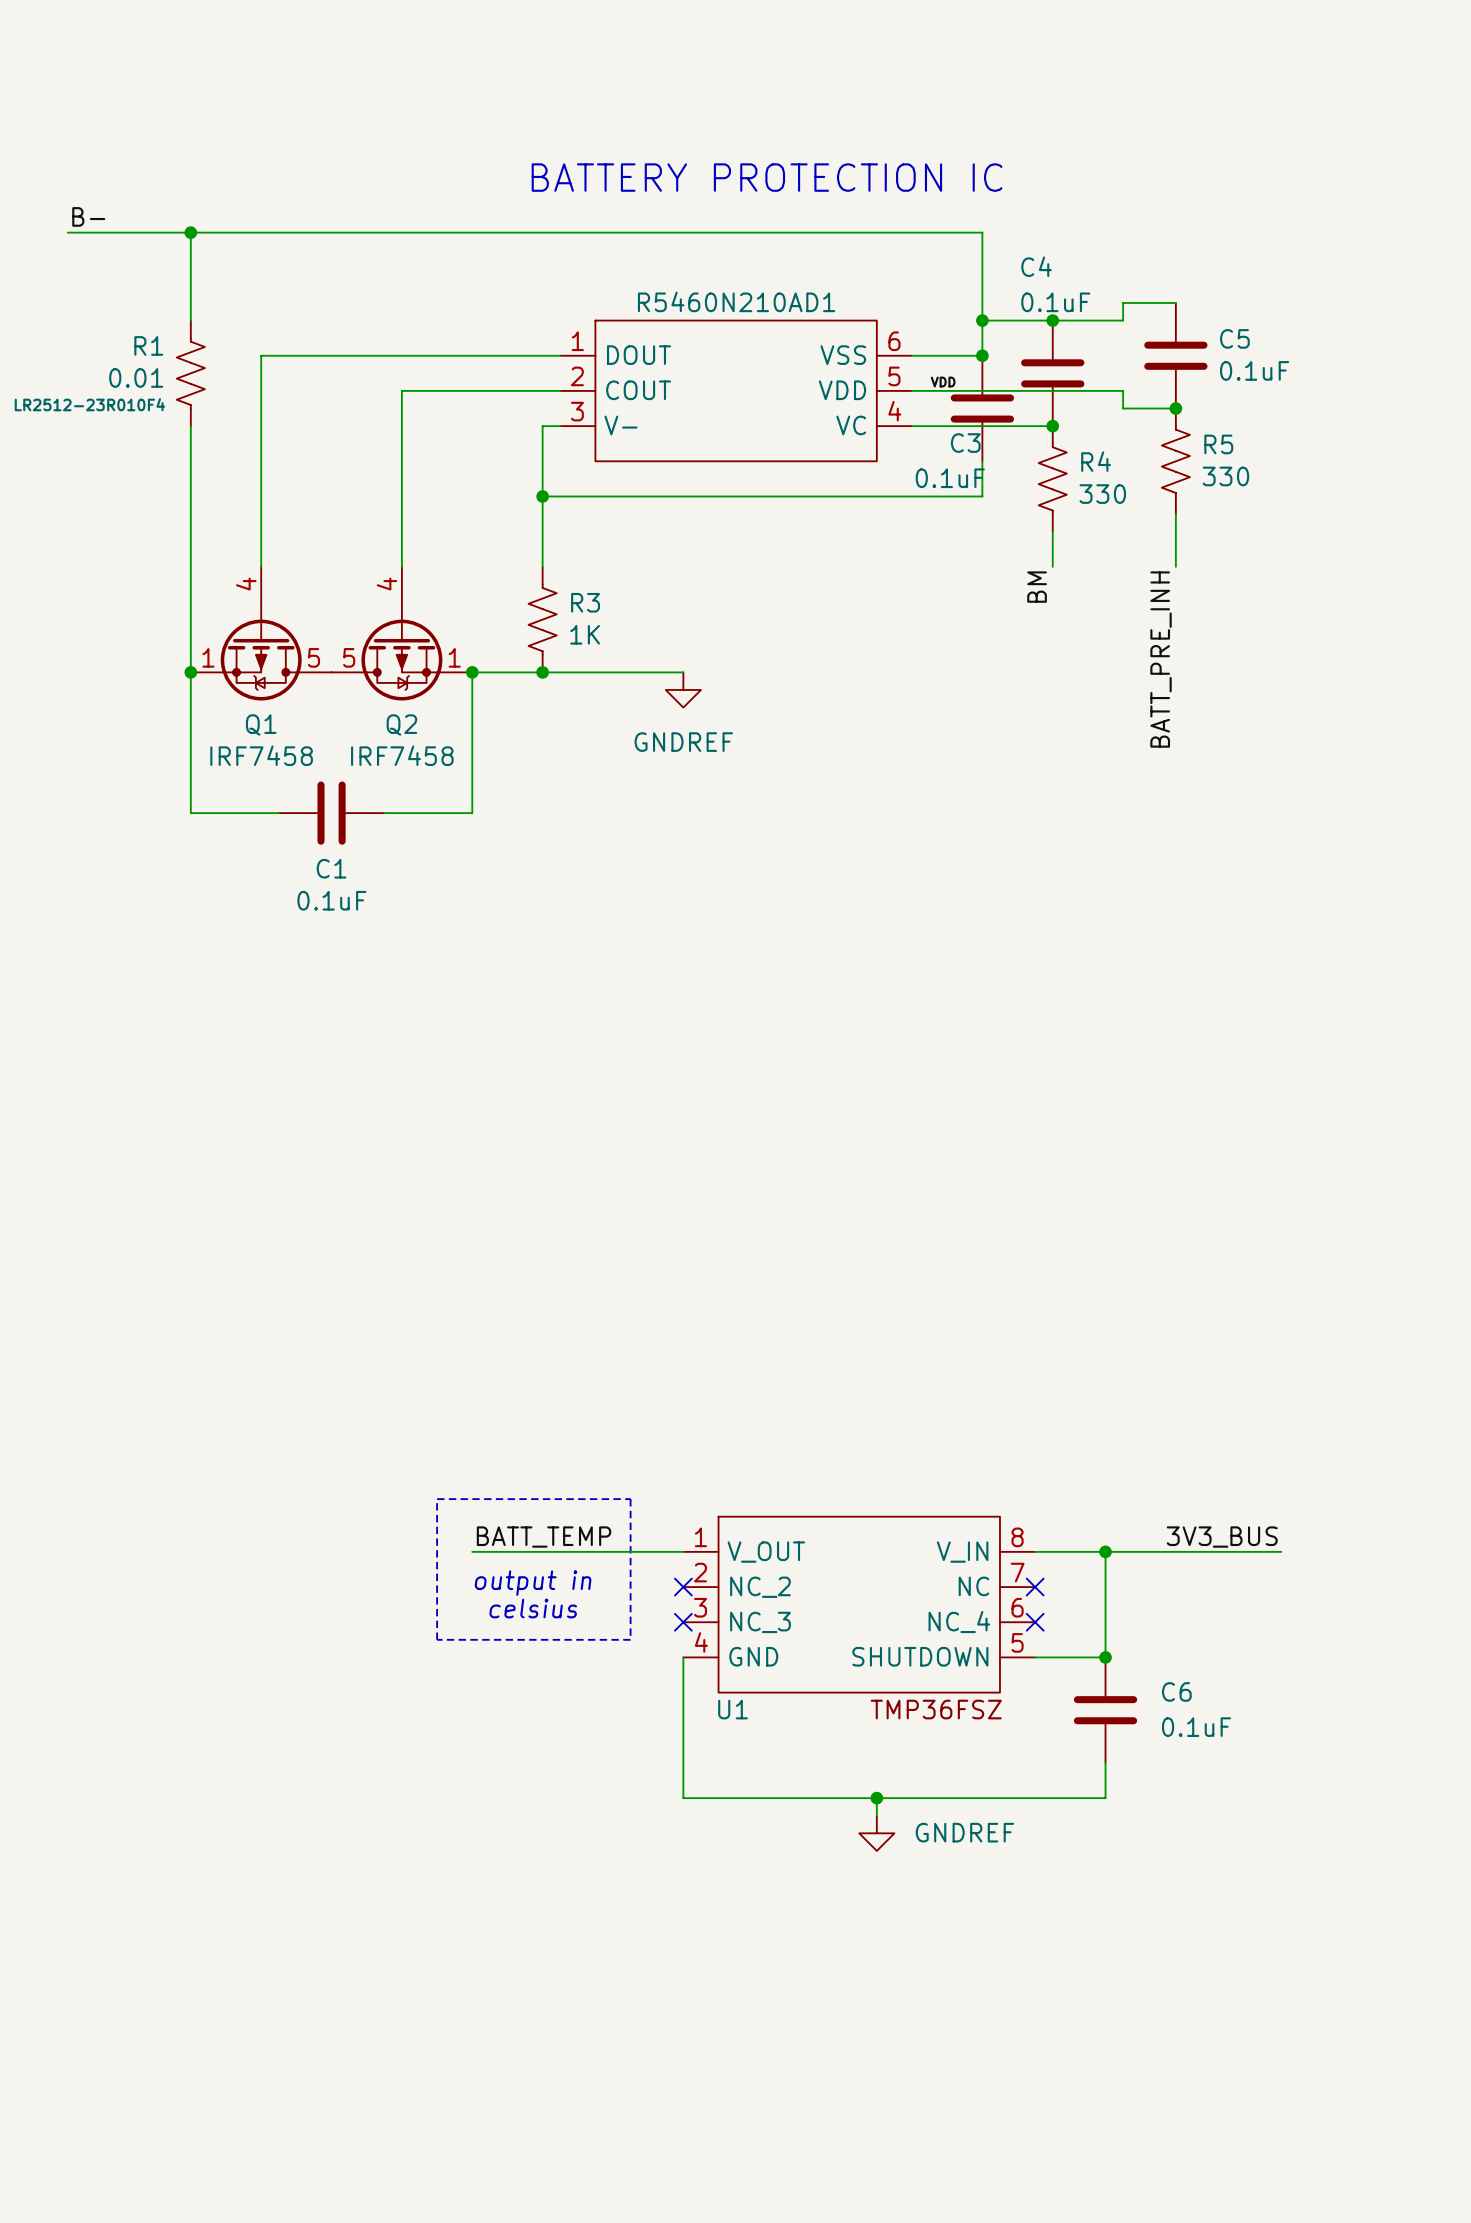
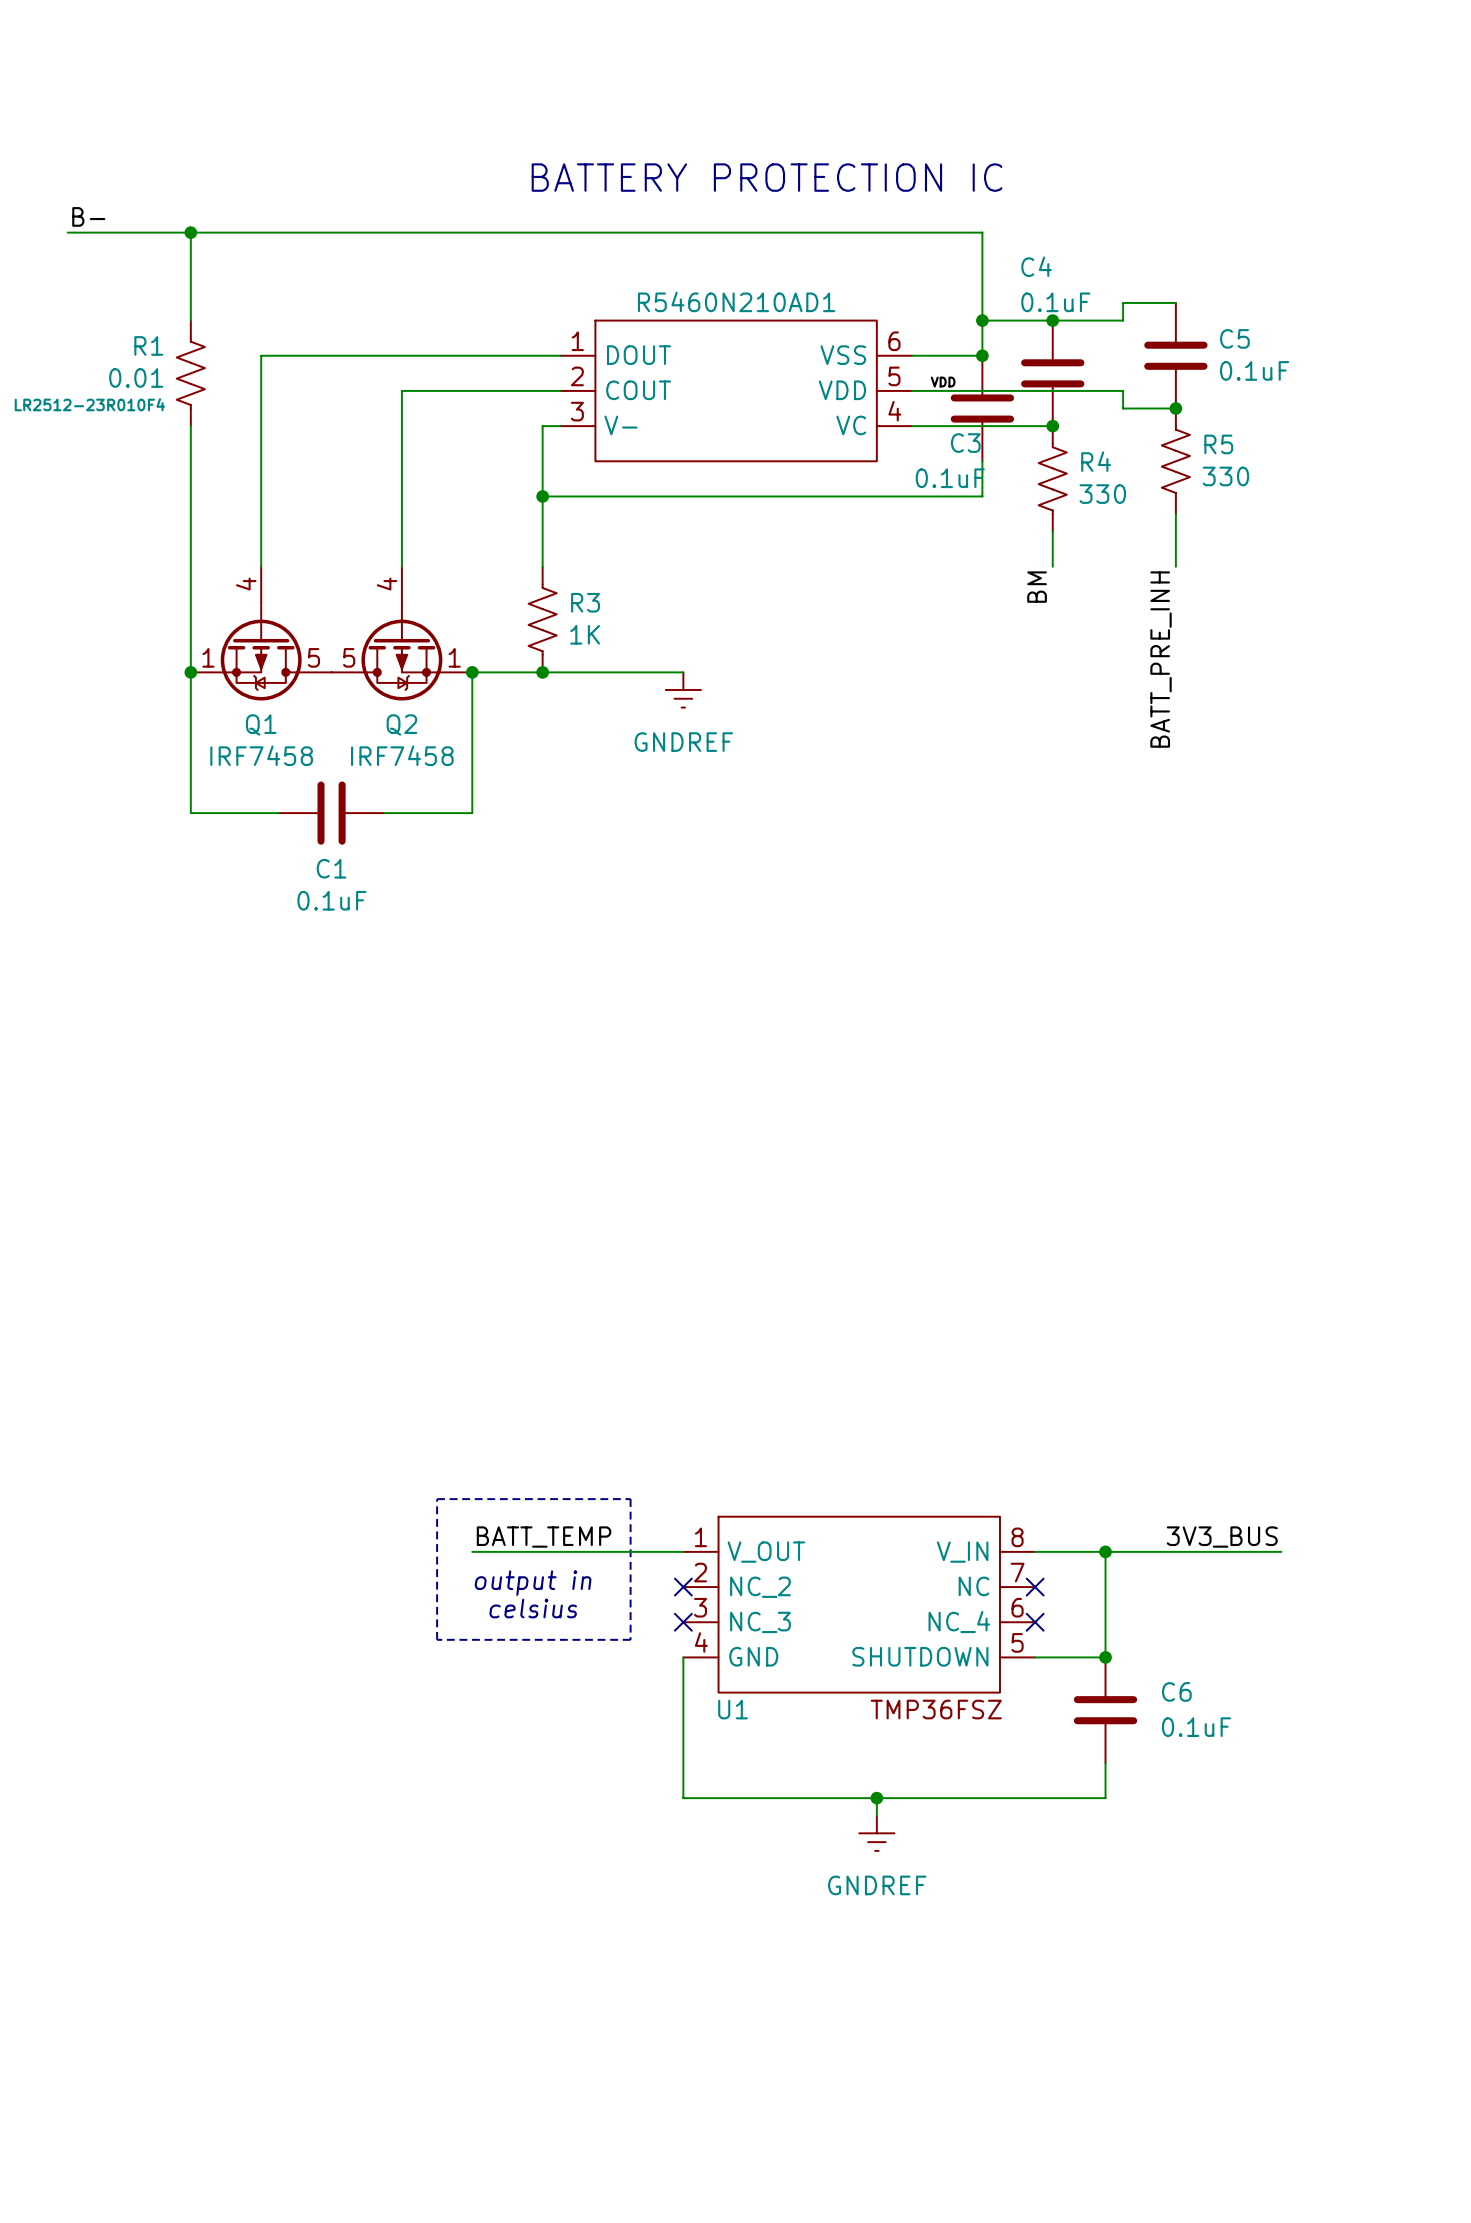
power symbol shape: [665, 672, 701, 708] -> [665, 672, 701, 708]
power symbol shape: [859, 1815, 895, 1851] -> [859, 1815, 895, 1851]
power symbol text position: GNDREF (964, 1832) -> GNDREF (877, 1885)

